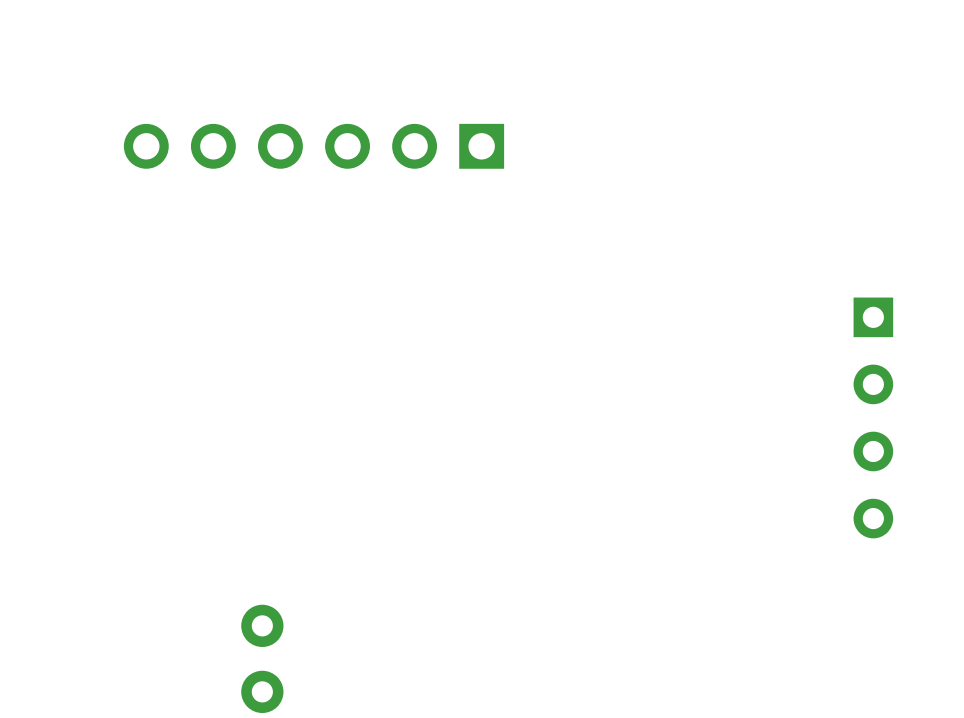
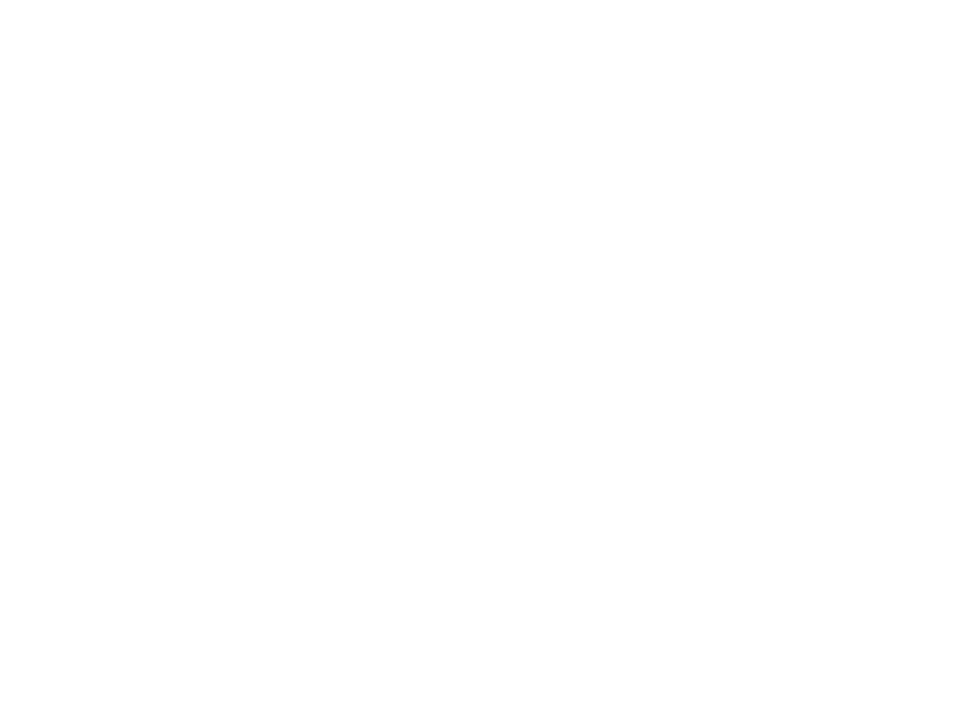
part: (313, 146) -> none
part: (873, 417) -> none
part: (262, 658) -> none

